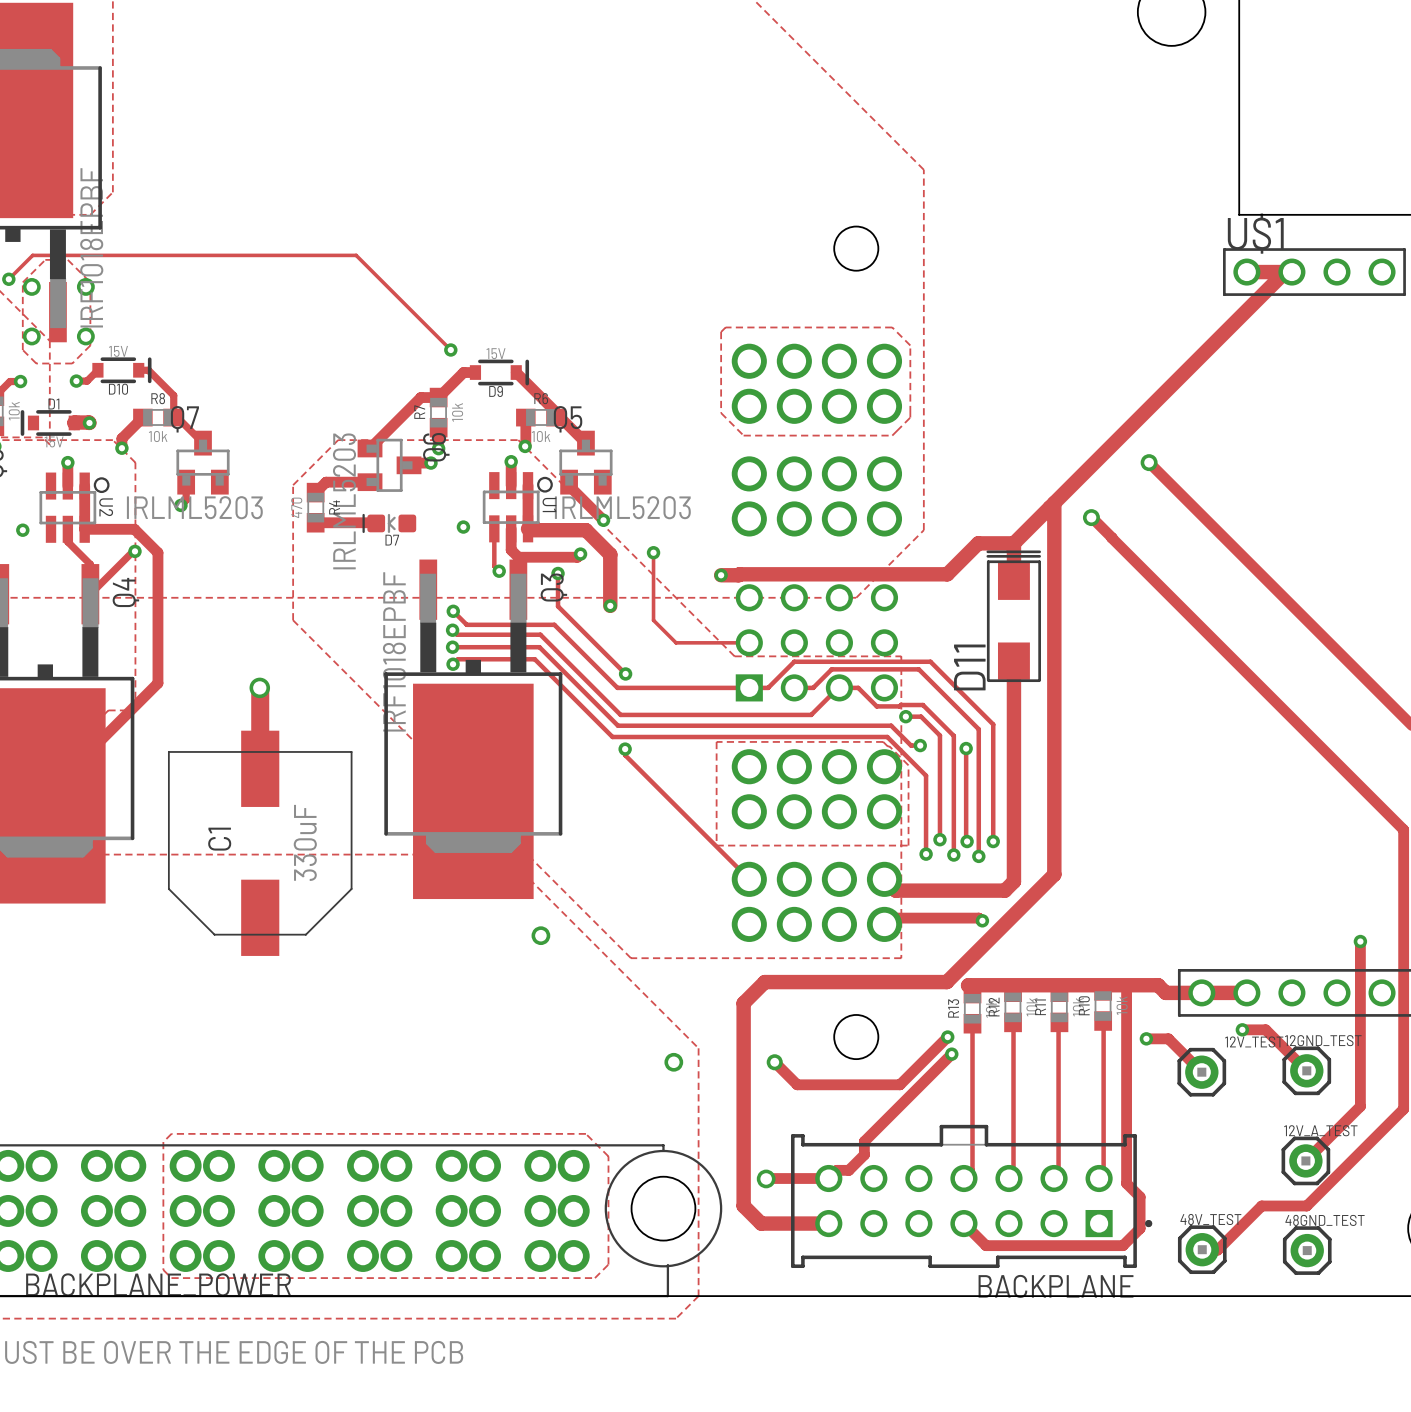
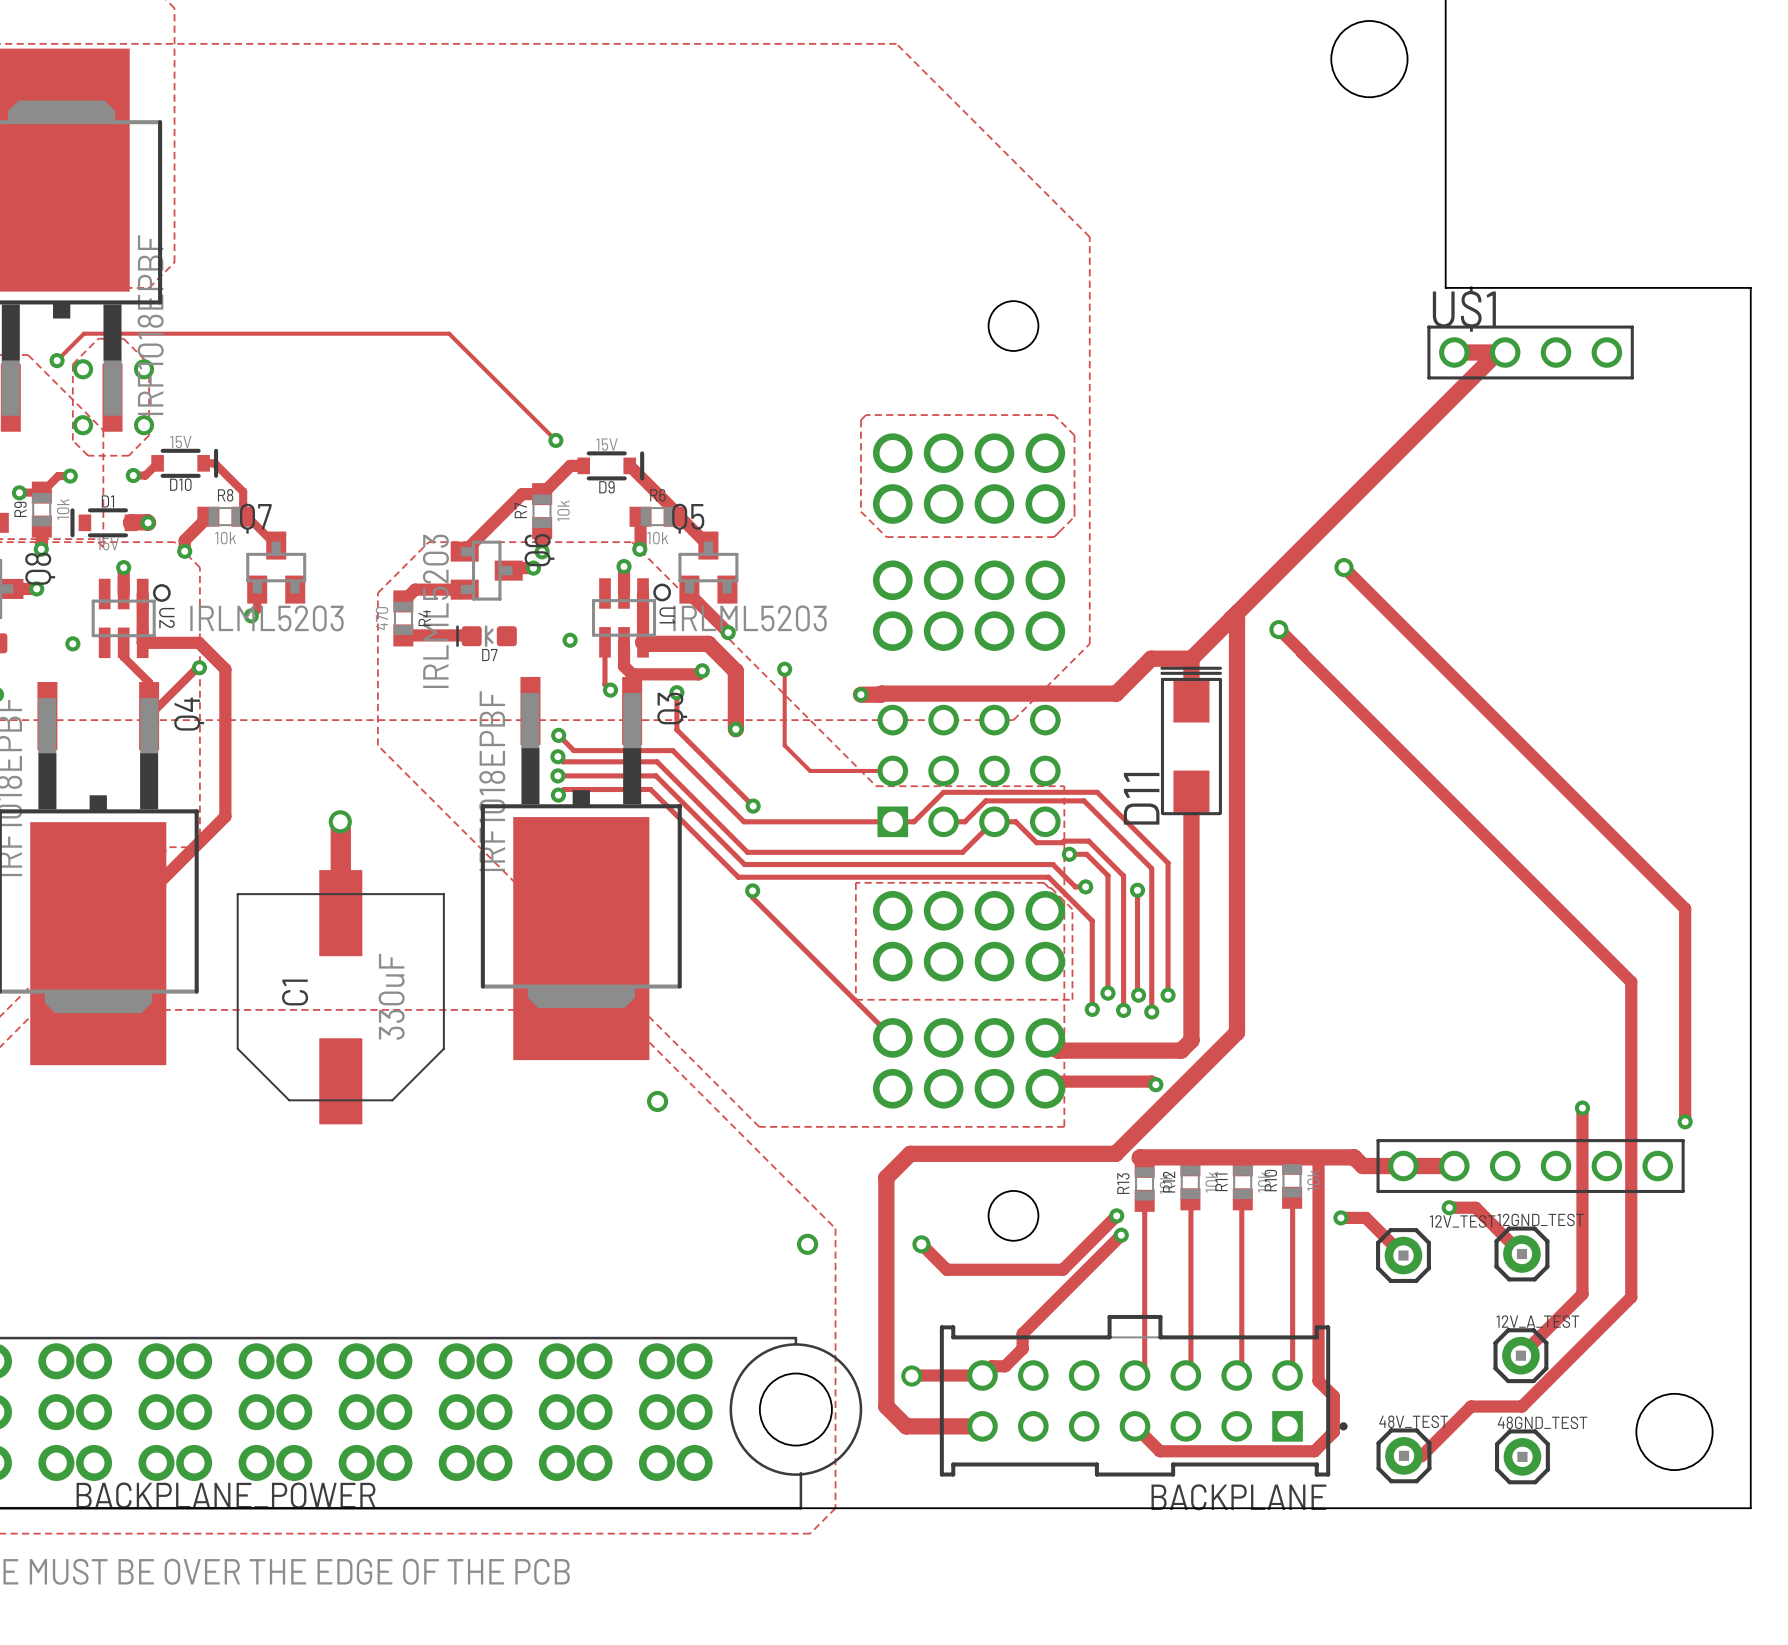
zone outline: (171, 1133) (585, 1133) (608, 1156) (608, 1264) (594, 1278) (171, 1278) (163, 1269) (163, 1142) (171, 1133) -> none

